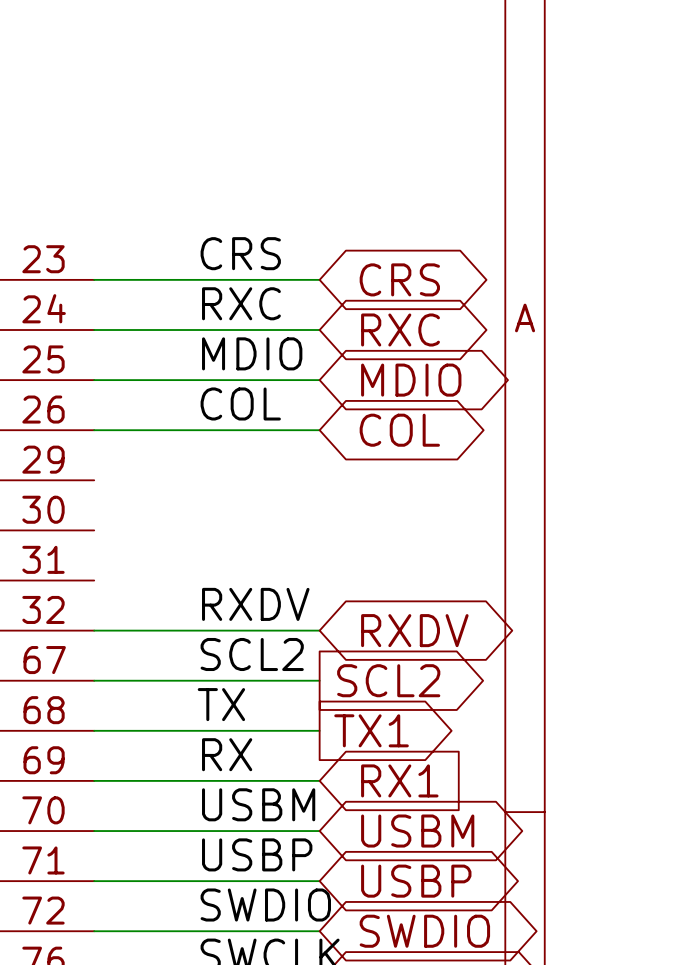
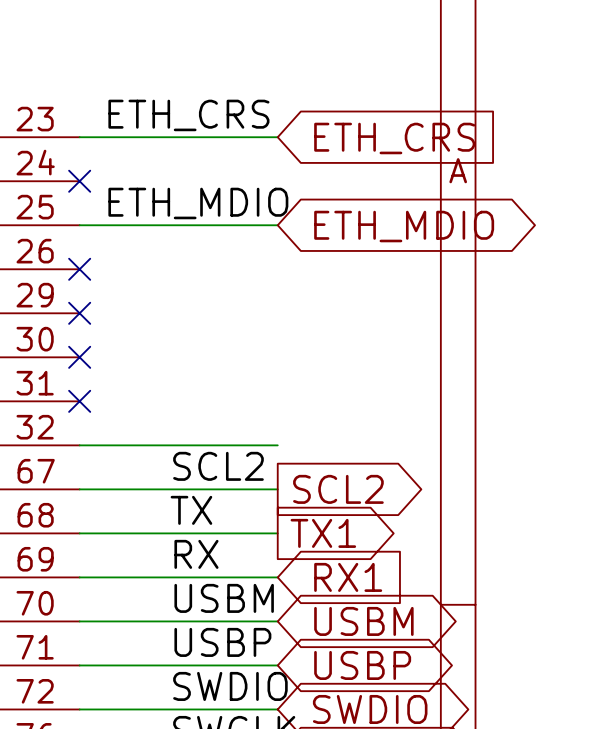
label: CRS (240, 253) -> none
label: none -> ETH_CRS (188, 115)
global label shape: bidirectional (399, 279) -> input (394, 138)
global label: CRS (399, 279) -> ETH_CRS (394, 138)
label: RXC (241, 303) -> none
wire: (94, 330) (319, 330) -> none
no-connect mark: none -> (79, 181)
global label: RXC (400, 330) -> none
label: MDIO (252, 353) -> ETH_MDIO (198, 203)
global label: MDIO (411, 380) -> ETH_MDIO (404, 226)
label: COL (240, 403) -> none
wire: (94, 430) (319, 430) -> none
no-connect mark: none -> (79, 269)
global label: COL (399, 430) -> none
no-connect mark: none -> (79, 313)
no-connect mark: none -> (79, 357)
no-connect mark: none -> (79, 401)
label: RXDV (255, 604) -> none
global label: RXDV (414, 630) -> none

